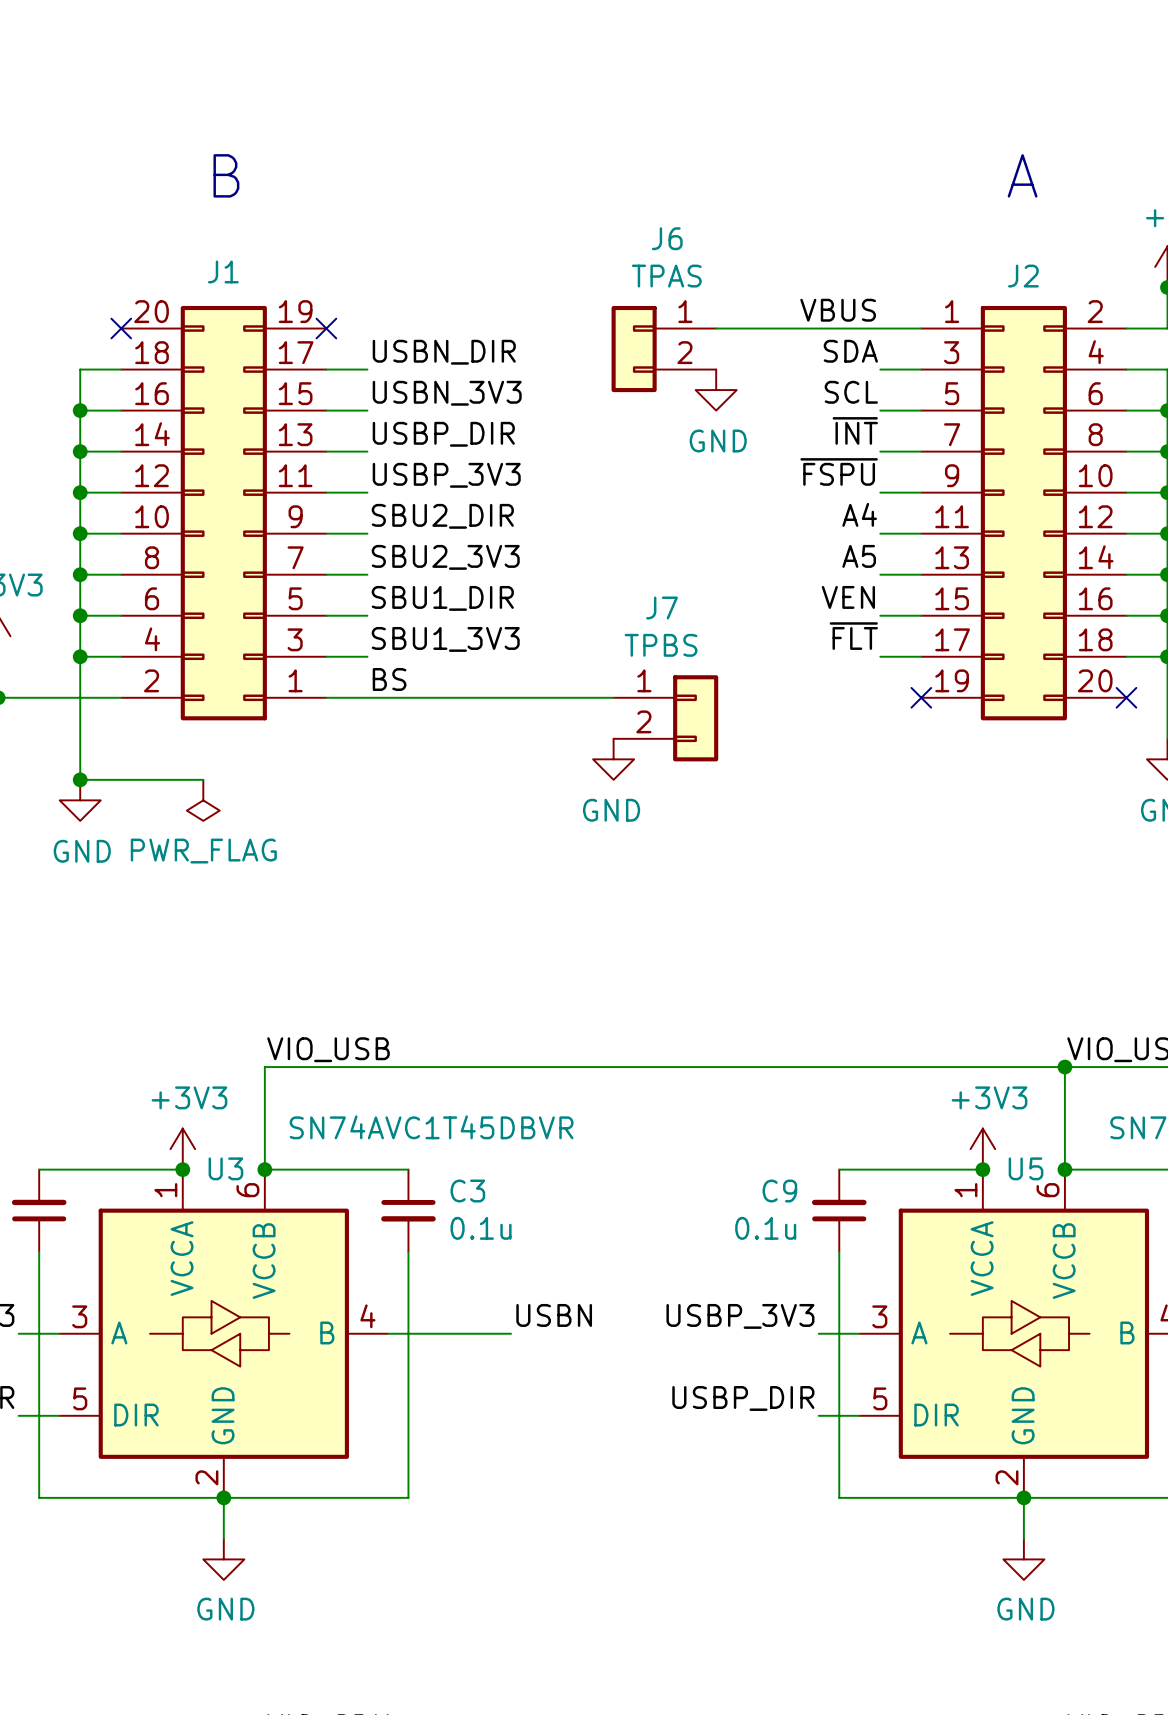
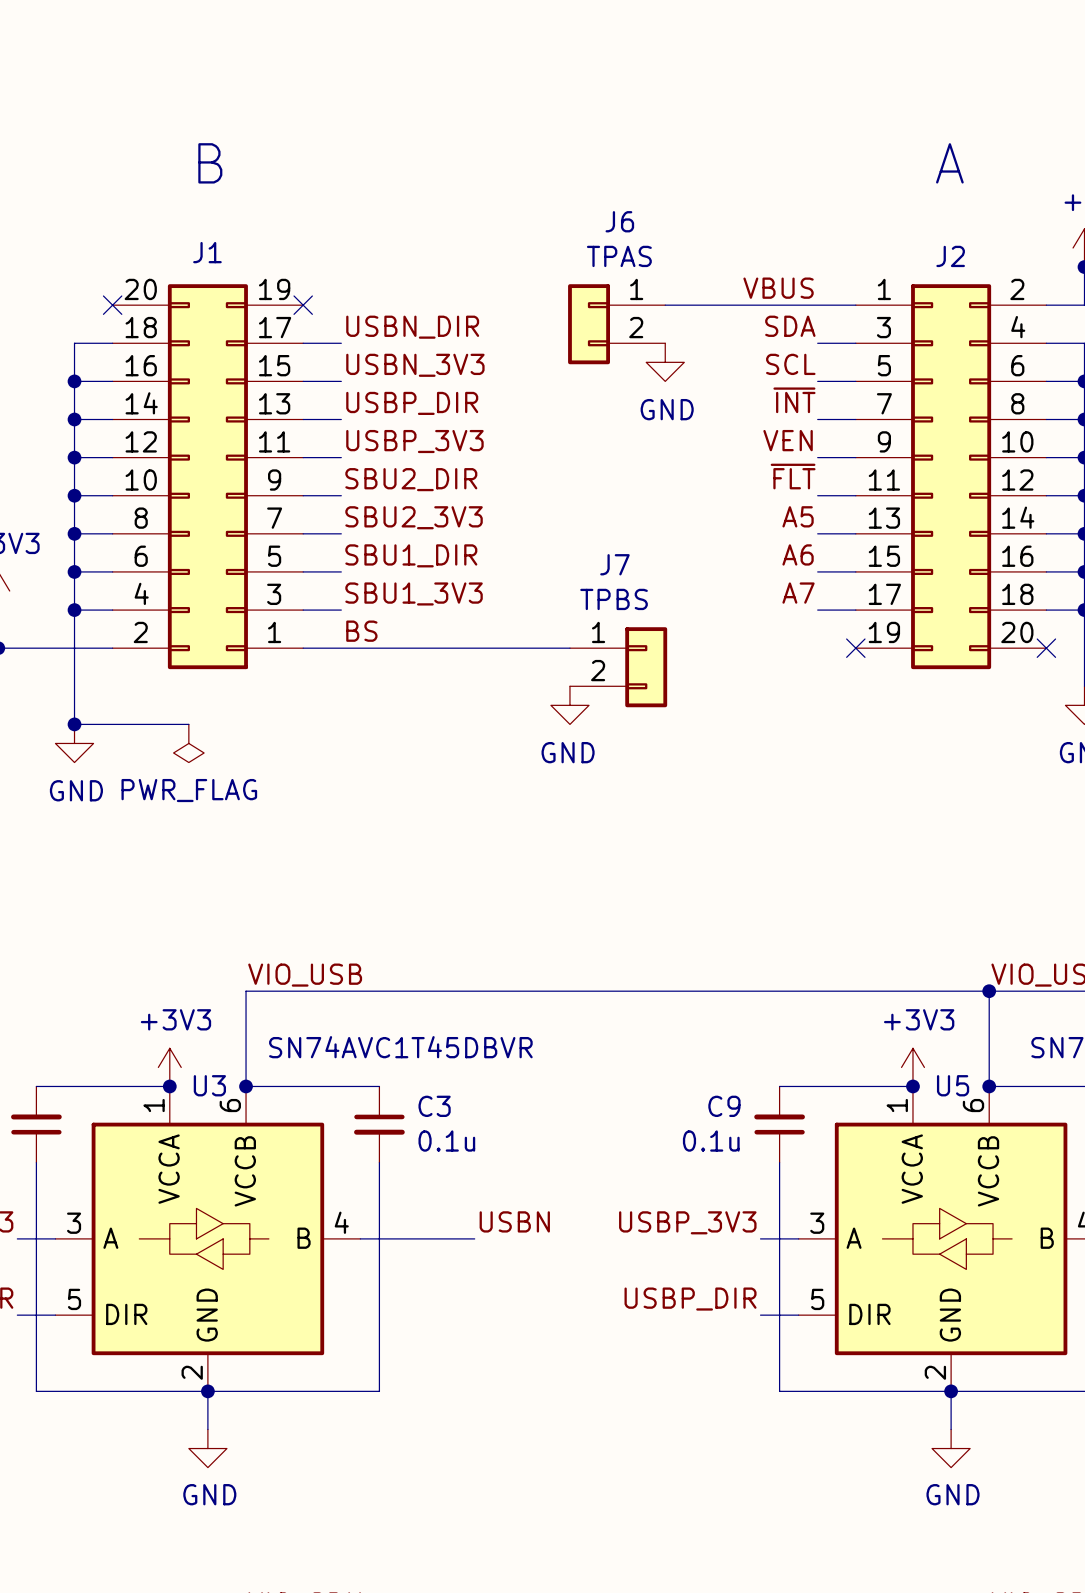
label: ~{FSPU} (839, 471) -> VEN (788, 440)
label: A4 (859, 514) -> ~{FLT} (793, 476)
label: VEN (848, 597) -> A6 (798, 554)
label: ~{FLT} (853, 636) -> A7 (798, 593)

